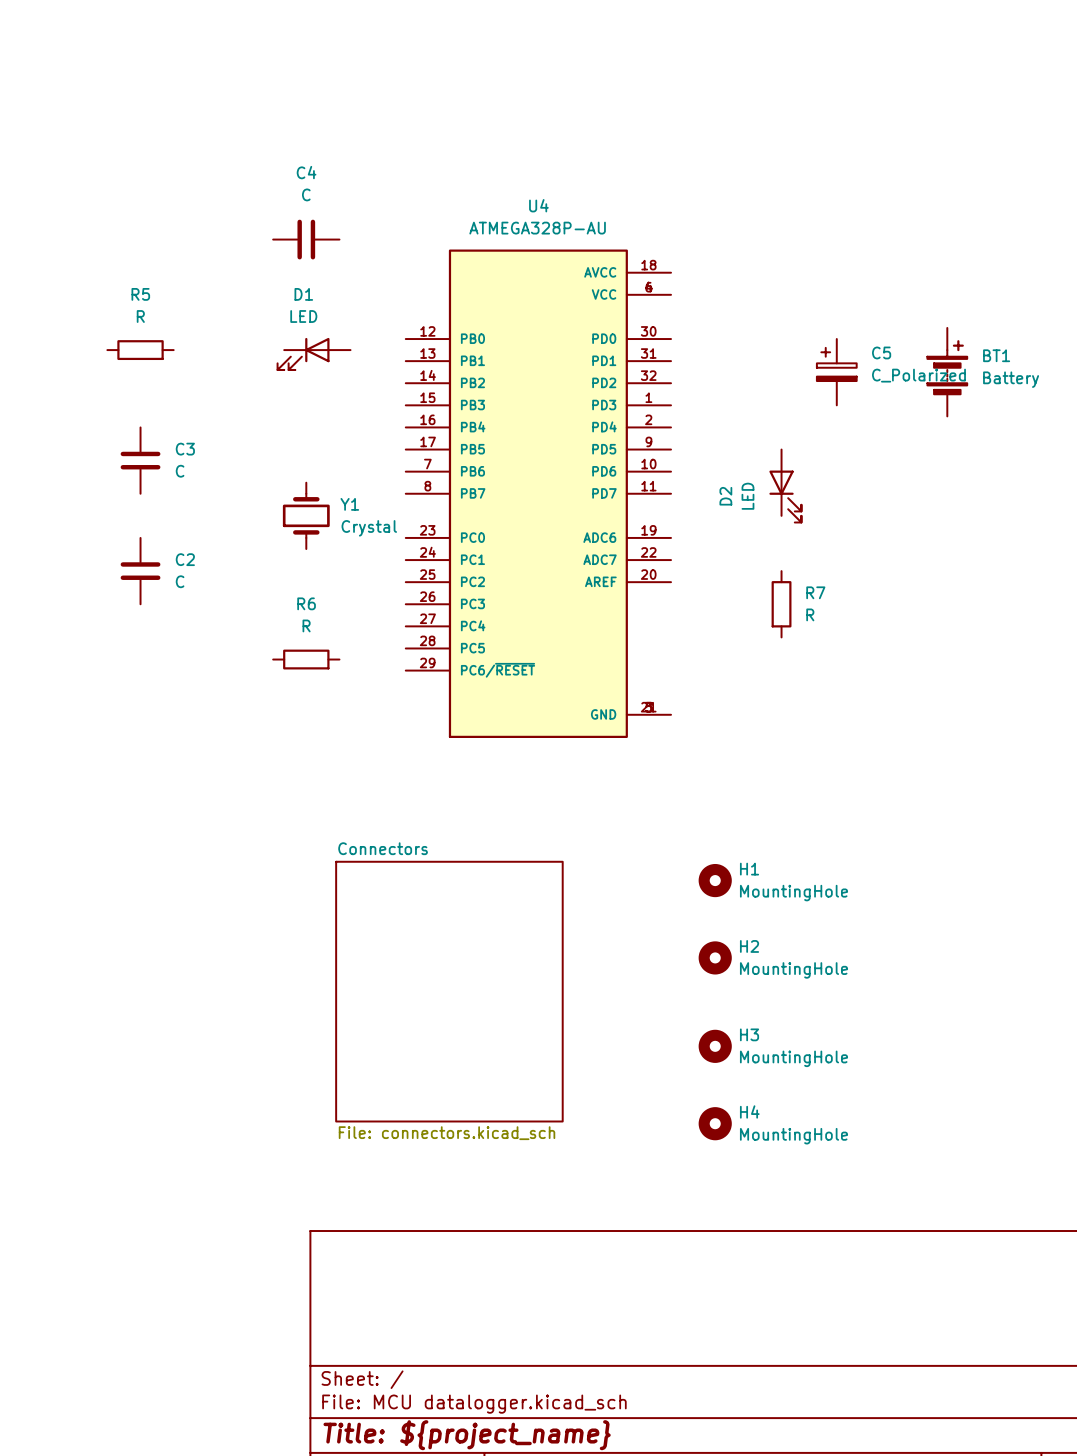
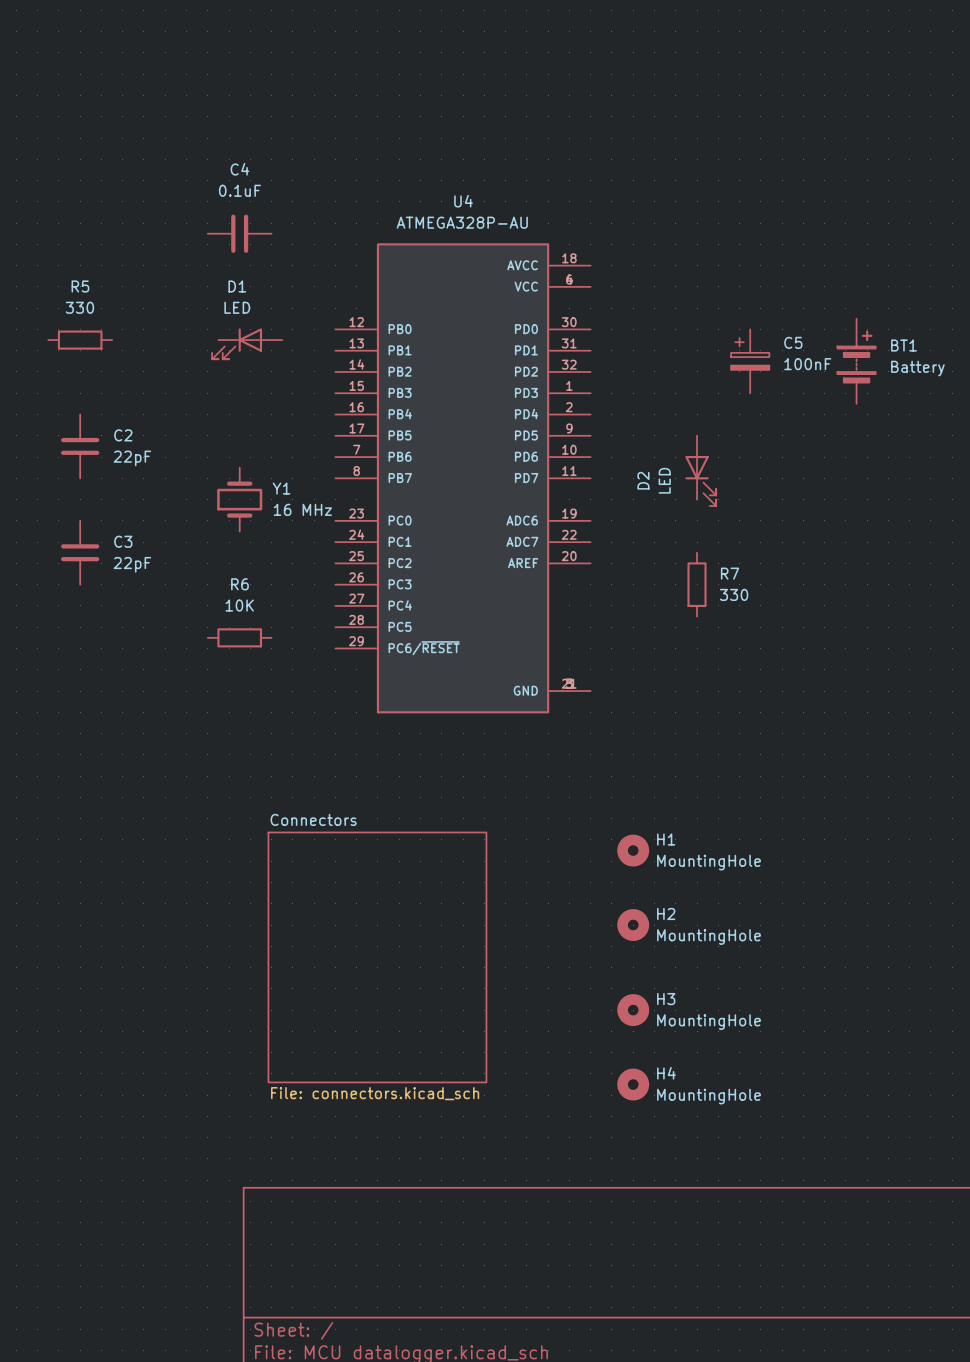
C4 value: C (306, 194) -> 0.1uF (239, 190)
R5 value: R (140, 316) -> 330 (79, 307)
C5 value: C_Polarized (918, 375) -> 100nF (807, 364)
C3 name: C3 (185, 449) -> C2 (123, 435)
C3 value: C (180, 471) -> 22pF (132, 458)
Y1 value: Crystal (369, 528) -> 16 MHz (302, 509)
C2 name: C2 (185, 559) -> C3 (123, 541)
C2 value: C (180, 581) -> 22pF (132, 564)
R7 value: R (810, 614) -> 330 (734, 594)
R6 value: R (306, 625) -> 10K (239, 605)

